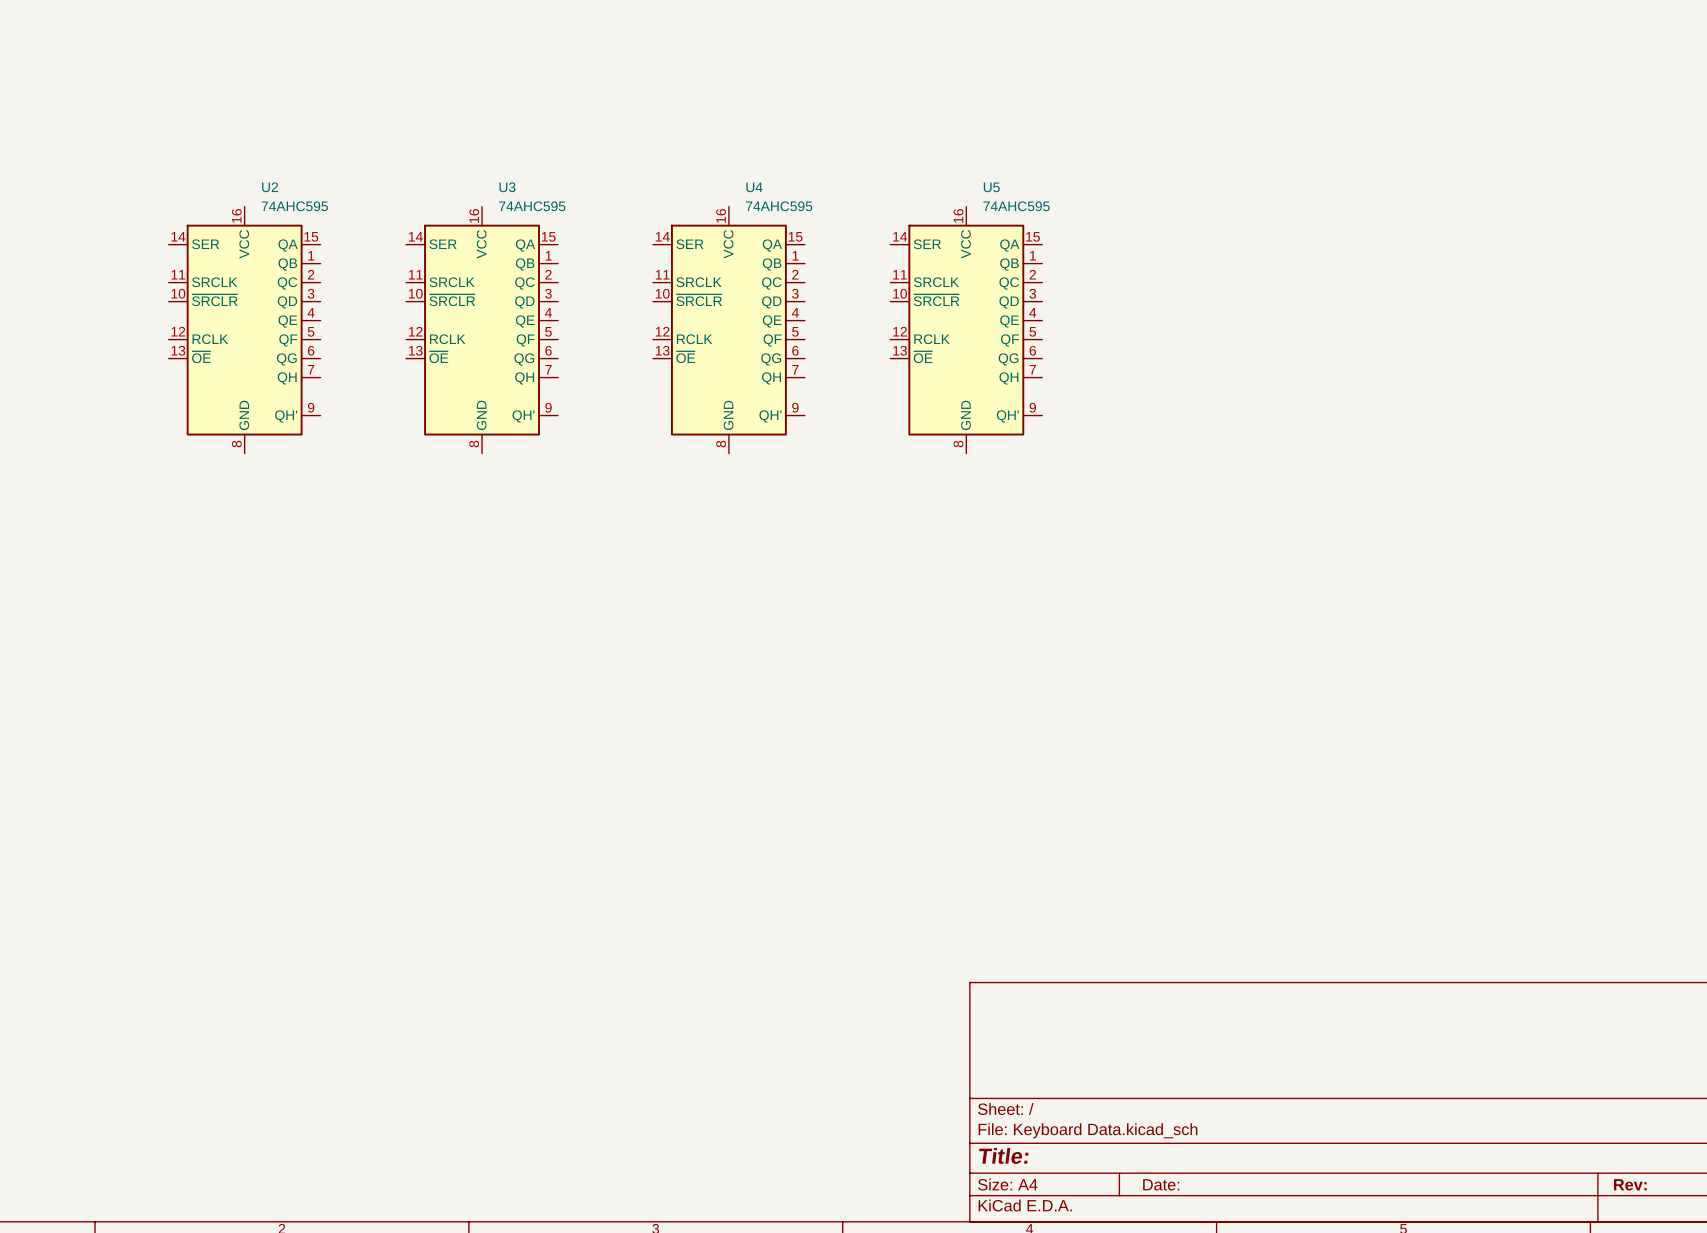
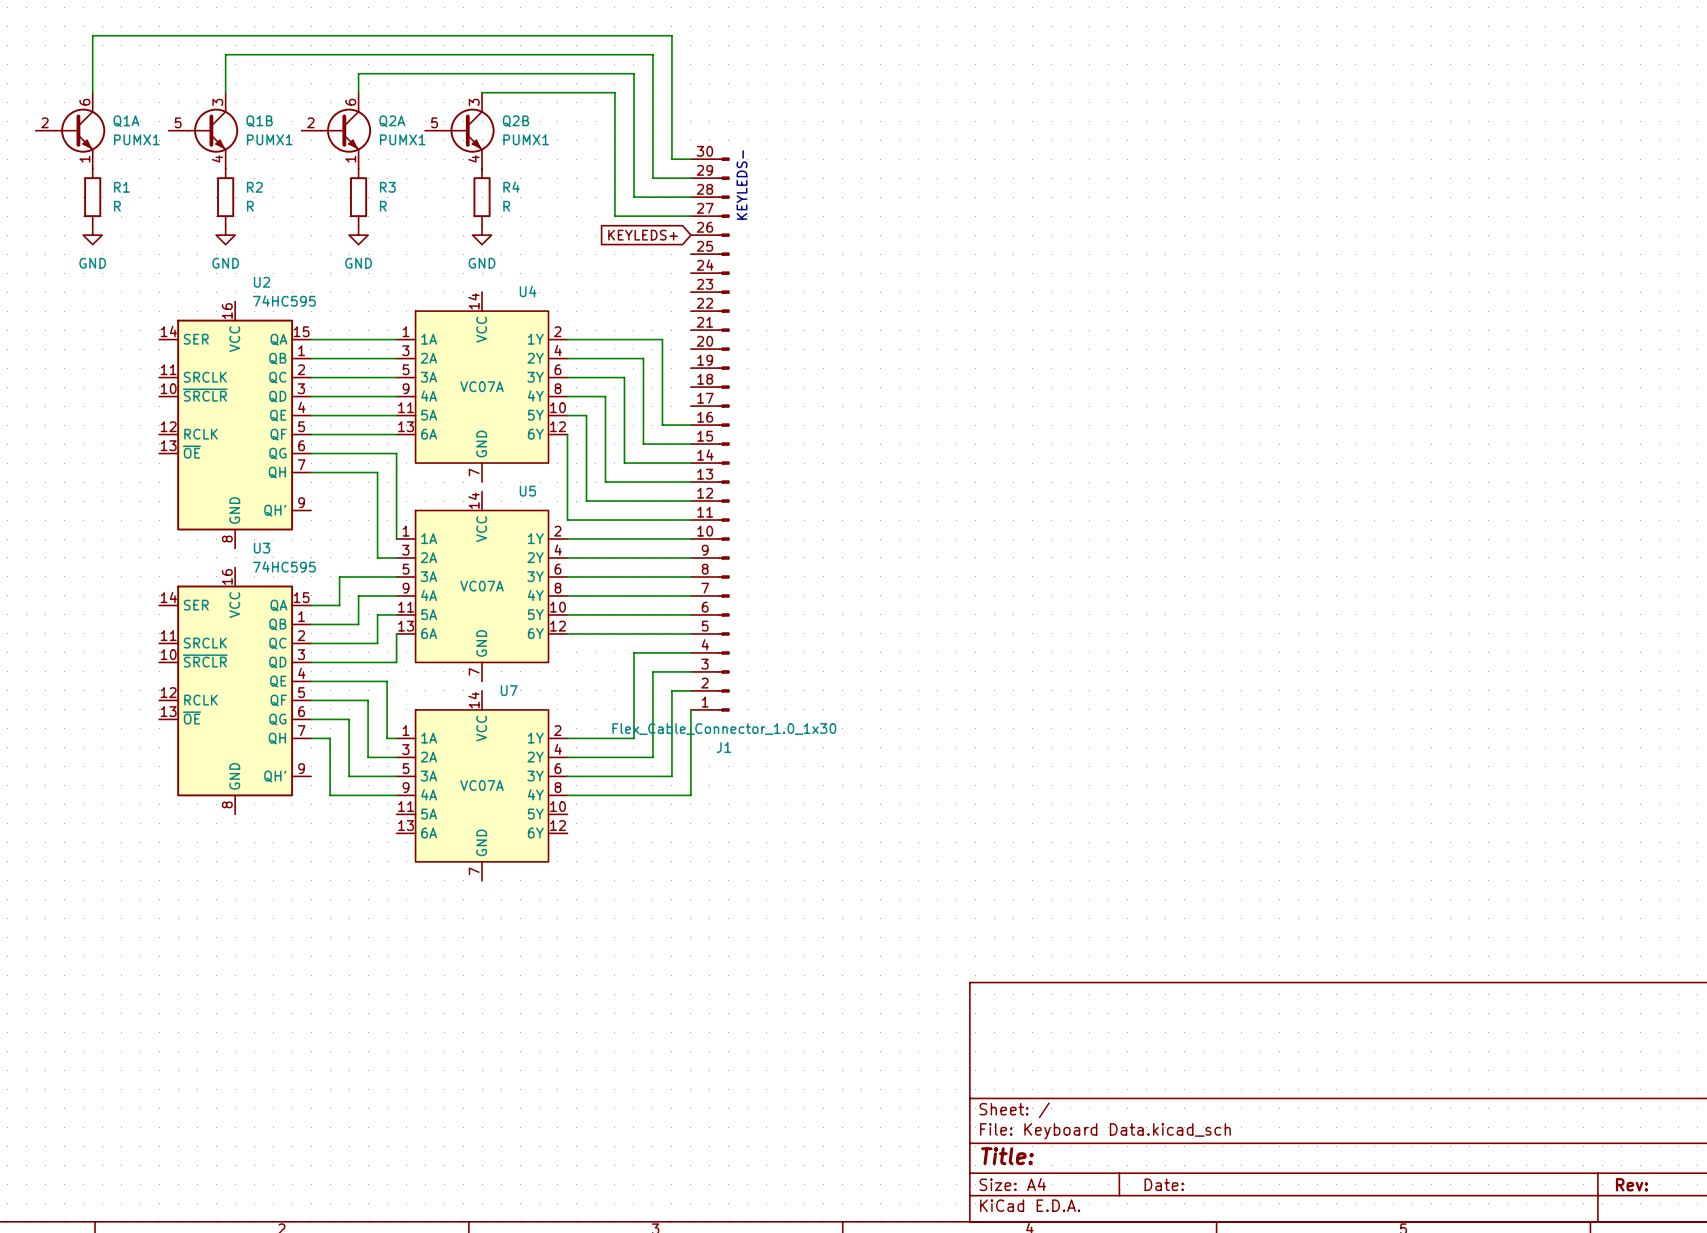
wire: none -> (92, 92) (92, 35) (671, 35) (671, 159) (690, 159)
wire: none -> (225, 92) (225, 54) (652, 54) (652, 178) (690, 178)
wire: none -> (358, 92) (358, 73) (633, 73) (633, 197) (690, 197)
wire: none -> (482, 92) (614, 92) (614, 216) (690, 216)
Q1A: none -> PUMX1 (70, 130)
Q1B: none -> PUMX1 (203, 130)
Q2A: none -> PUMX1 (336, 130)
Q2B: none -> PUMX1 (459, 130)
text: none -> KEYLEDS- (742, 184)
U4 name position: U4 (754, 187) -> U4 (528, 291)
U5 name position: U5 (991, 187) -> U5 (527, 491)
R1: none -> R (92, 197)
R2: none -> R (225, 197)
R3: none -> R (358, 197)
R4: none -> R (482, 197)
U2 value: 74AHC595 (294, 206) -> 74HC595 (284, 301)
U3 value: 74AHC595 (532, 206) -> 74HC595 (284, 566)
U4 symbol: [652, 206, 805, 454] -> [396, 292, 568, 483]
U4 value: 74AHC595 (779, 206) -> VC07A (482, 386)
U5 symbol: [890, 206, 1043, 454] -> [396, 491, 568, 682]
U5 value: 74AHC595 (1016, 206) -> VC07A (482, 586)
power symbol: none -> GND (92, 235)
power symbol: none -> GND (225, 235)
power symbol: none -> GND (358, 235)
power symbol: none -> GND (482, 235)
global label: none -> KEYLEDS+ (643, 235)
U2 position: (244, 330) -> (235, 425)
U3 position: (482, 330) -> (235, 690)
wire: none -> (311, 339) (396, 339)
wire: none -> (567, 339) (662, 339) (662, 425) (690, 425)
wire: none -> (311, 358) (396, 358)
wire: none -> (567, 358) (643, 358) (643, 444) (690, 444)
wire: none -> (311, 377) (396, 377)
wire: none -> (567, 377) (624, 377) (624, 463) (690, 463)
wire: none -> (311, 396) (396, 396)
wire: none -> (567, 396) (605, 396) (605, 482) (690, 482)
wire: none -> (311, 415) (396, 415)
wire: none -> (567, 415) (586, 415) (586, 501) (690, 501)
wire: none -> (311, 434) (396, 434)
wire: none -> (567, 434) (567, 520) (690, 520)
J1: none -> Flex_Cable_Connector_1.0_1x30 (710, 434)
wire: none -> (311, 453) (396, 453) (396, 539)
wire: none -> (311, 472) (377, 472) (377, 557) (396, 557)
wire: none -> (567, 539) (690, 539)
wire: none -> (567, 557) (690, 557)
wire: none -> (396, 576) (339, 576) (339, 605) (311, 605)
wire: none -> (567, 576) (690, 576)
wire: none -> (396, 595) (358, 595) (358, 624) (311, 624)
wire: none -> (567, 595) (690, 595)
wire: none -> (396, 614) (377, 614) (377, 643) (311, 643)
wire: none -> (567, 614) (690, 614)
wire: none -> (396, 633) (396, 662) (311, 662)
wire: none -> (567, 633) (690, 633)
wire: none -> (690, 652) (633, 652) (633, 738) (567, 738)
wire: none -> (690, 671) (652, 671) (652, 757) (567, 757)
wire: none -> (311, 681) (387, 681) (387, 738) (396, 738)
wire: none -> (690, 690) (671, 690) (671, 776) (567, 776)
wire: none -> (311, 700) (368, 700) (368, 757) (396, 757)
wire: none -> (690, 709) (690, 795) (567, 795)
wire: none -> (311, 719) (349, 719) (349, 776) (396, 776)
wire: none -> (311, 738) (330, 738) (330, 795) (396, 795)
U7: none -> VC07A (482, 785)

